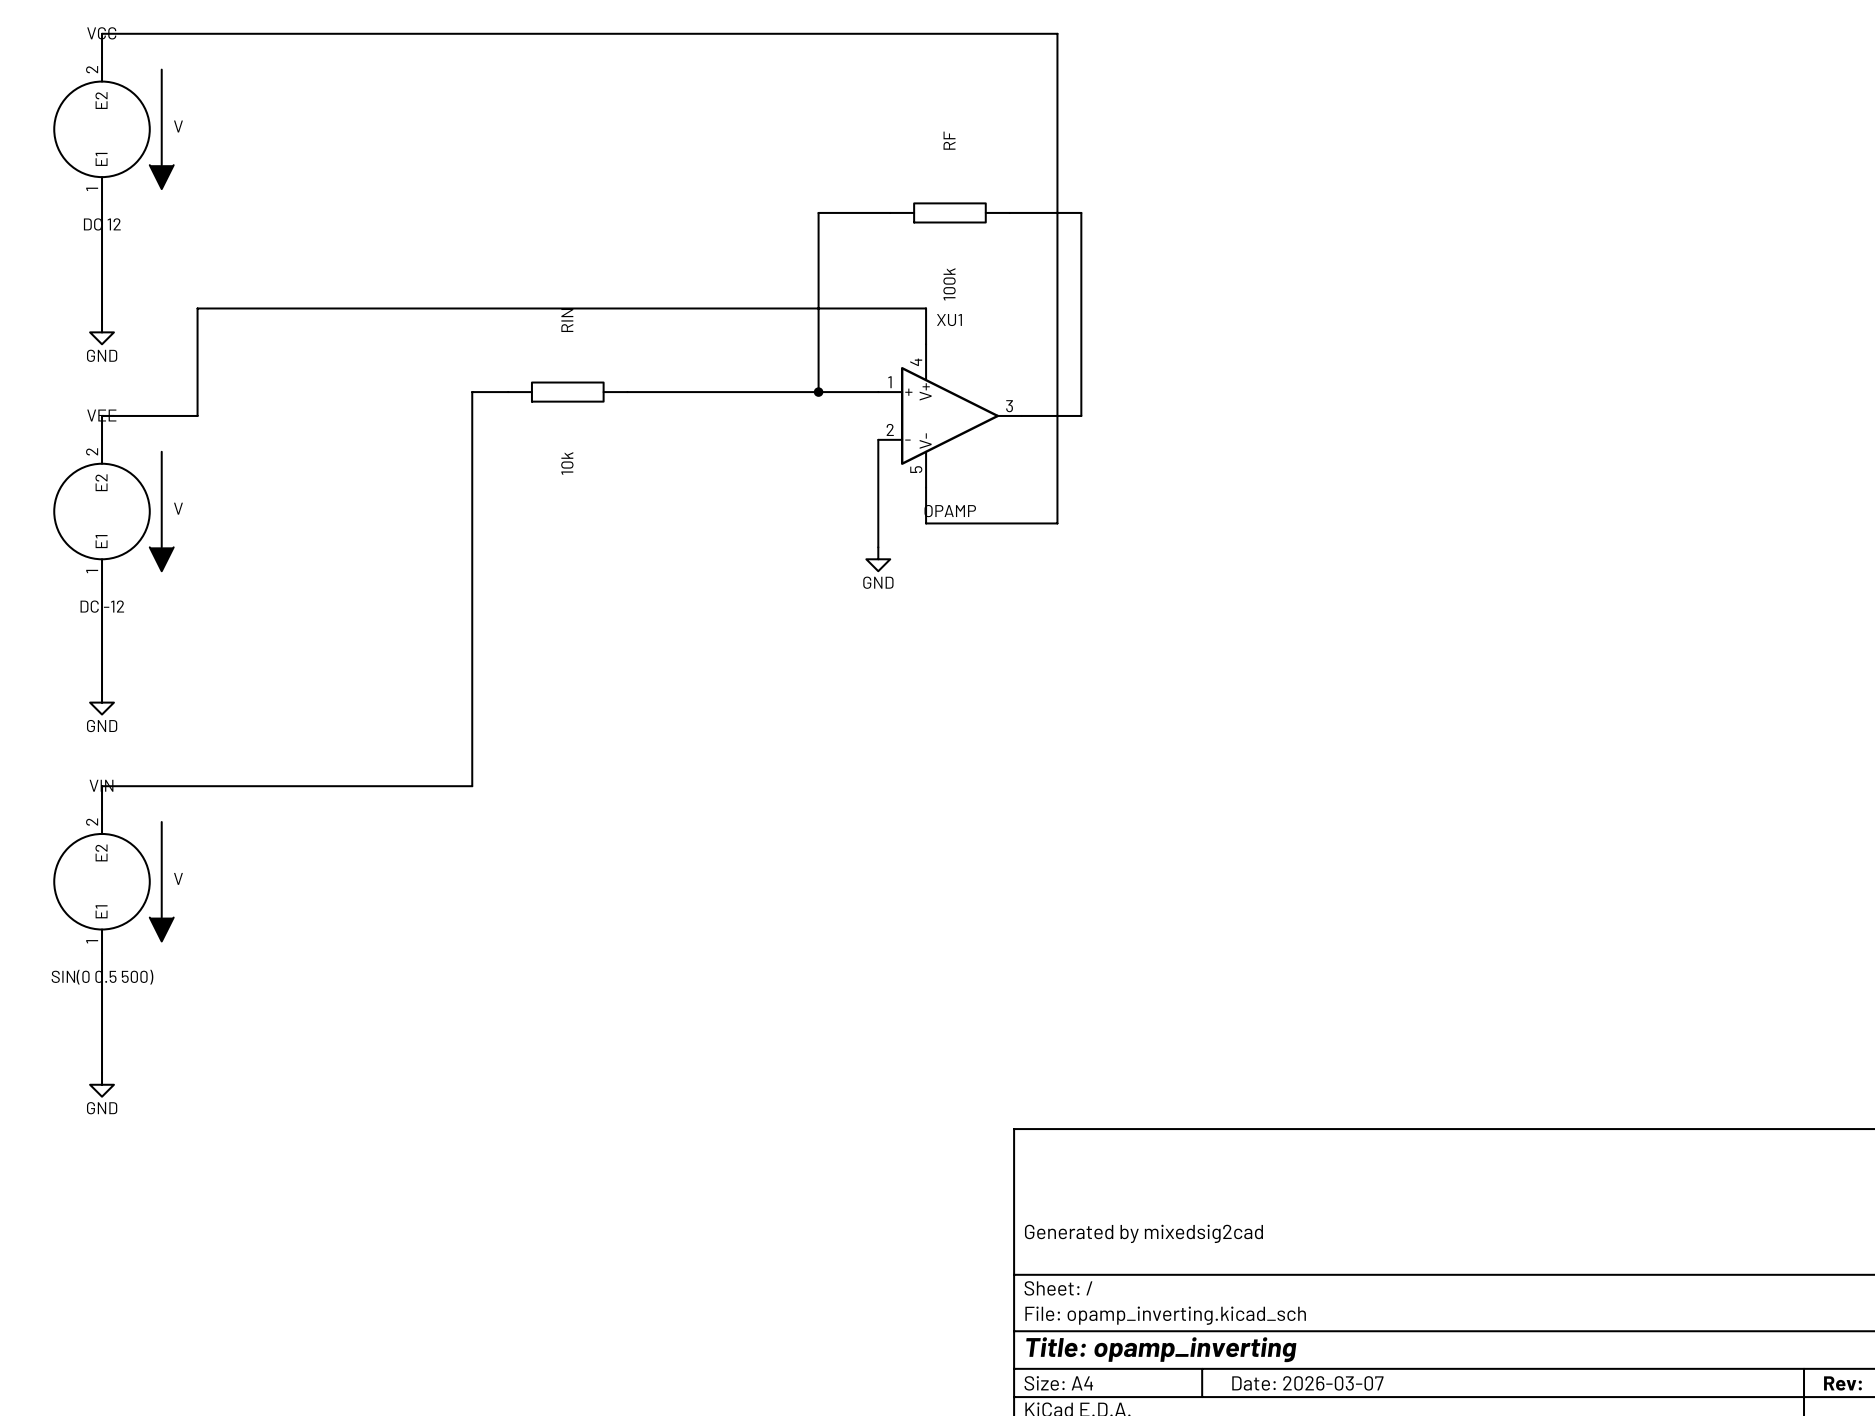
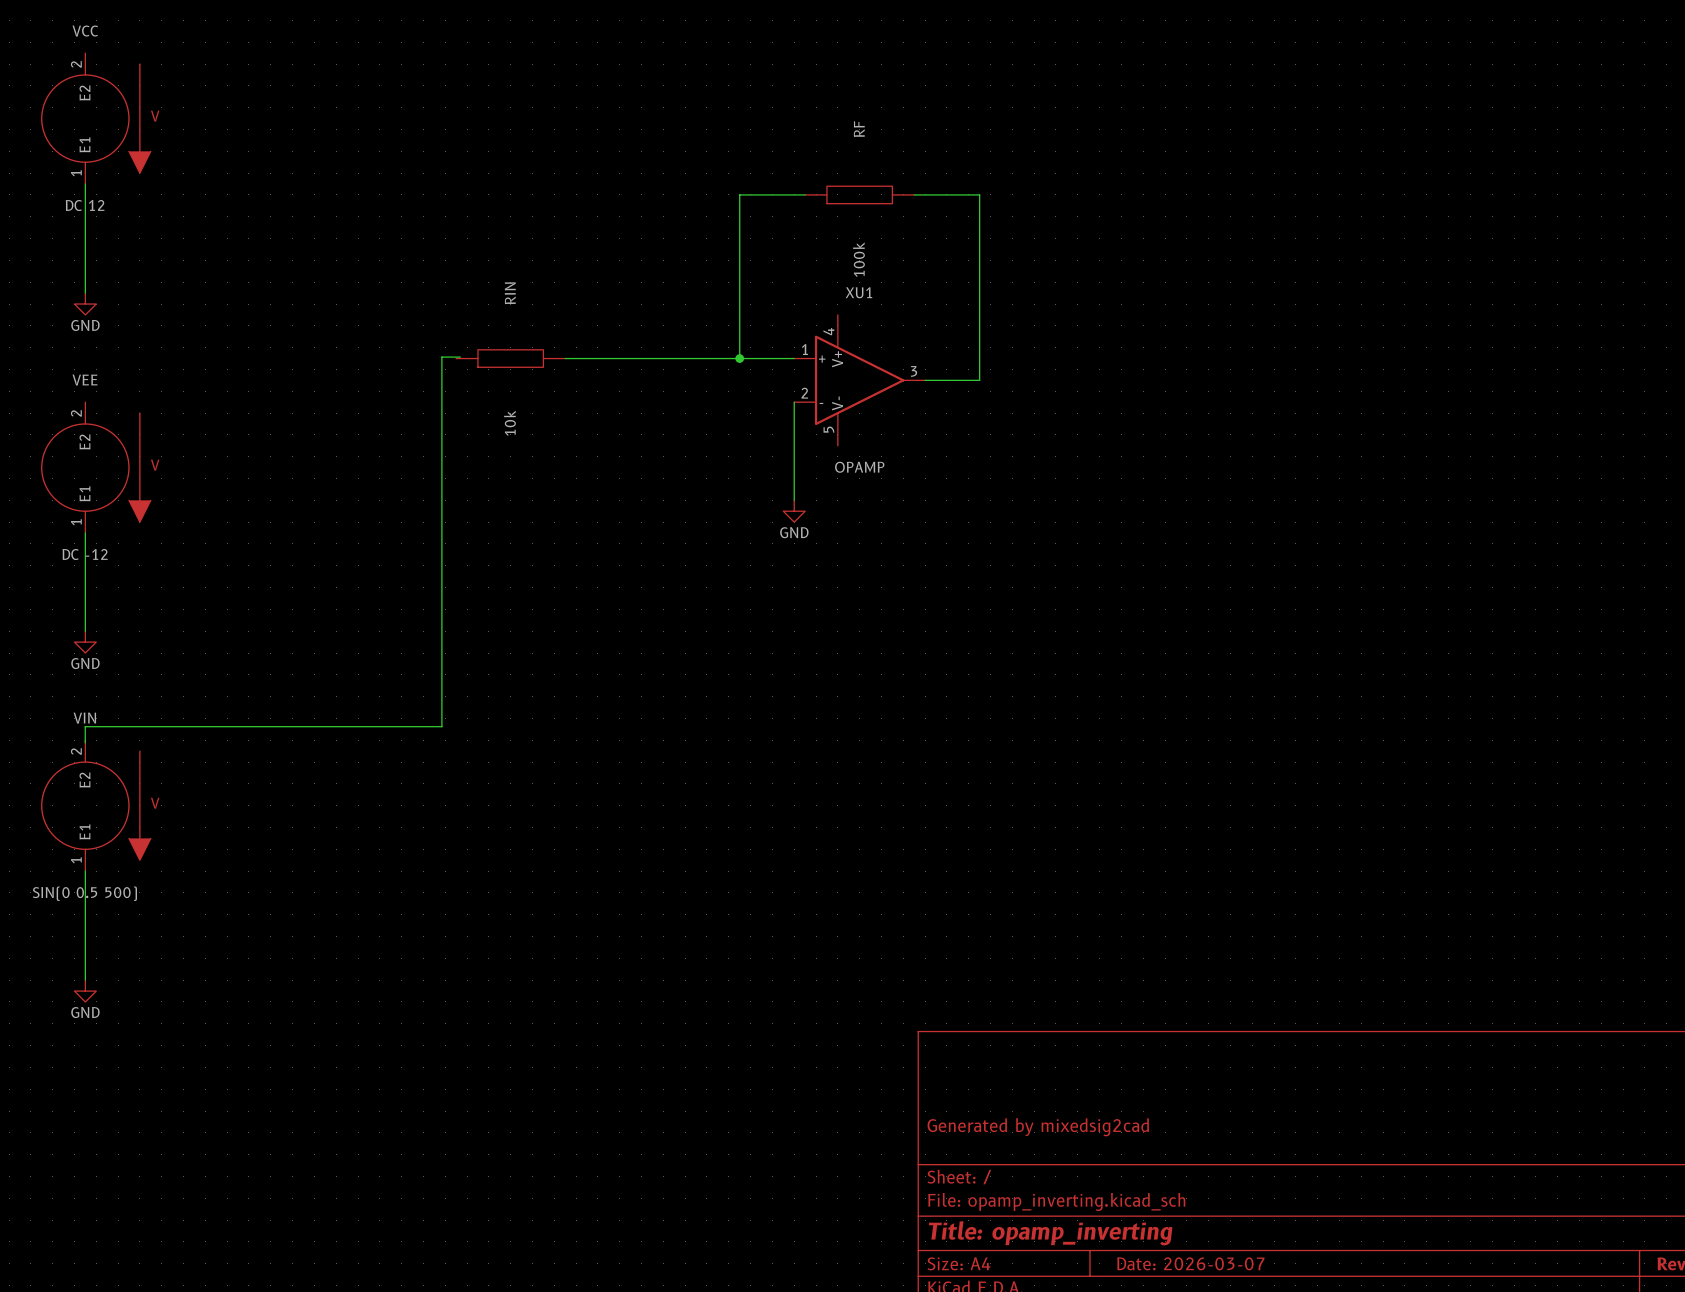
wire: (102, 57) (102, 33) (1057, 33) (1057, 523) (926, 523) (926, 487) -> none
wire: (926, 344) (926, 308) (197, 308) (197, 415) (102, 415) (102, 439) -> none
wire: none -> (460, 357) (441, 357) (441, 726) (85, 726) (85, 742)
wire: (508, 392) (472, 392) (472, 786) (102, 786) (102, 810) -> none

